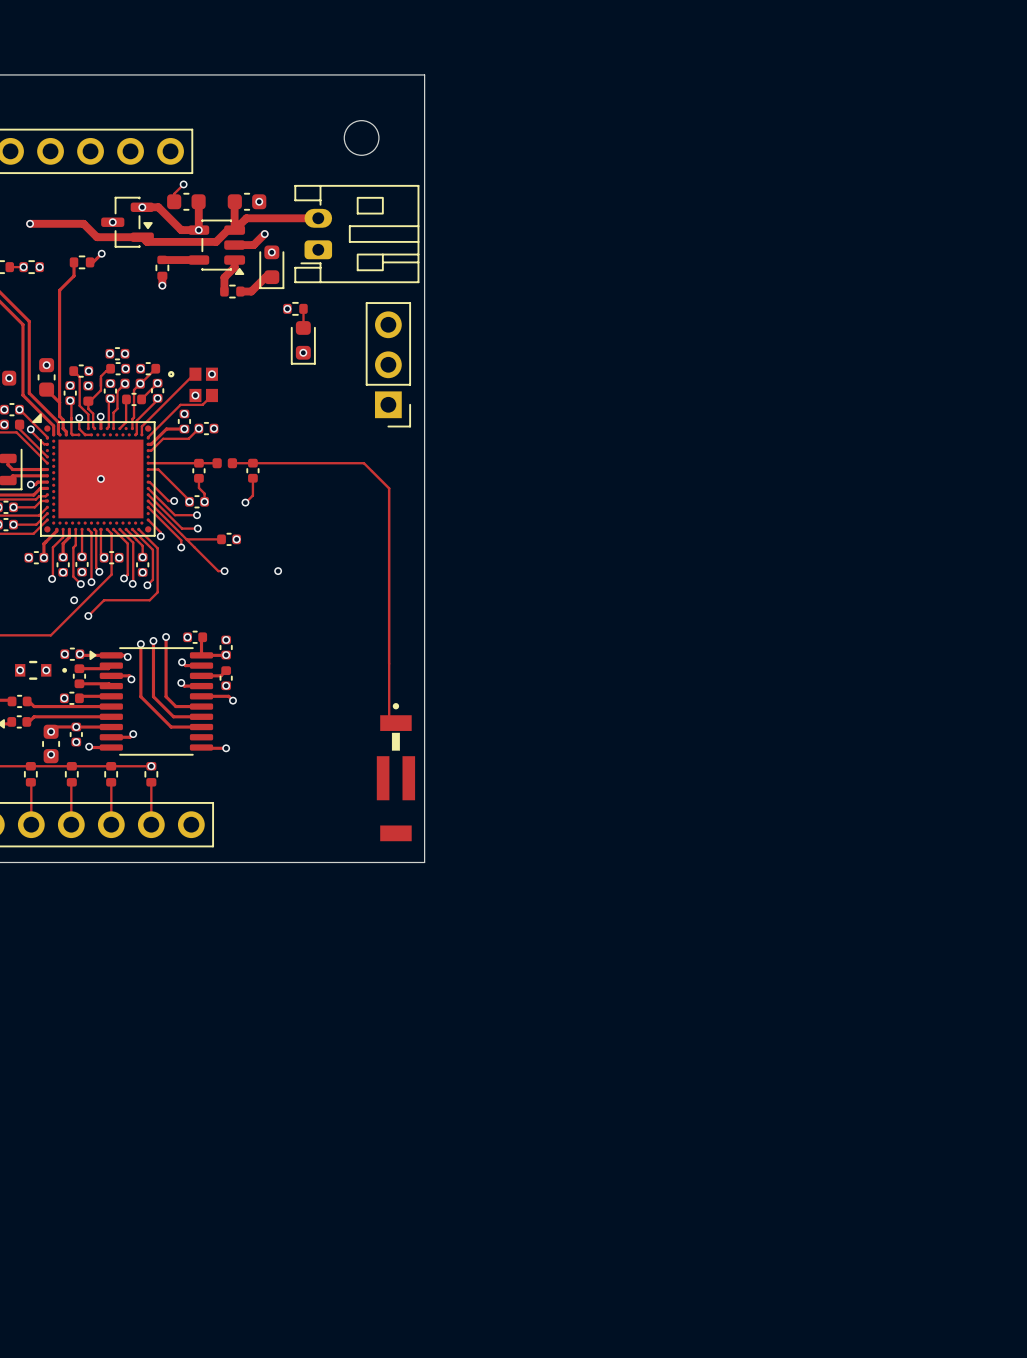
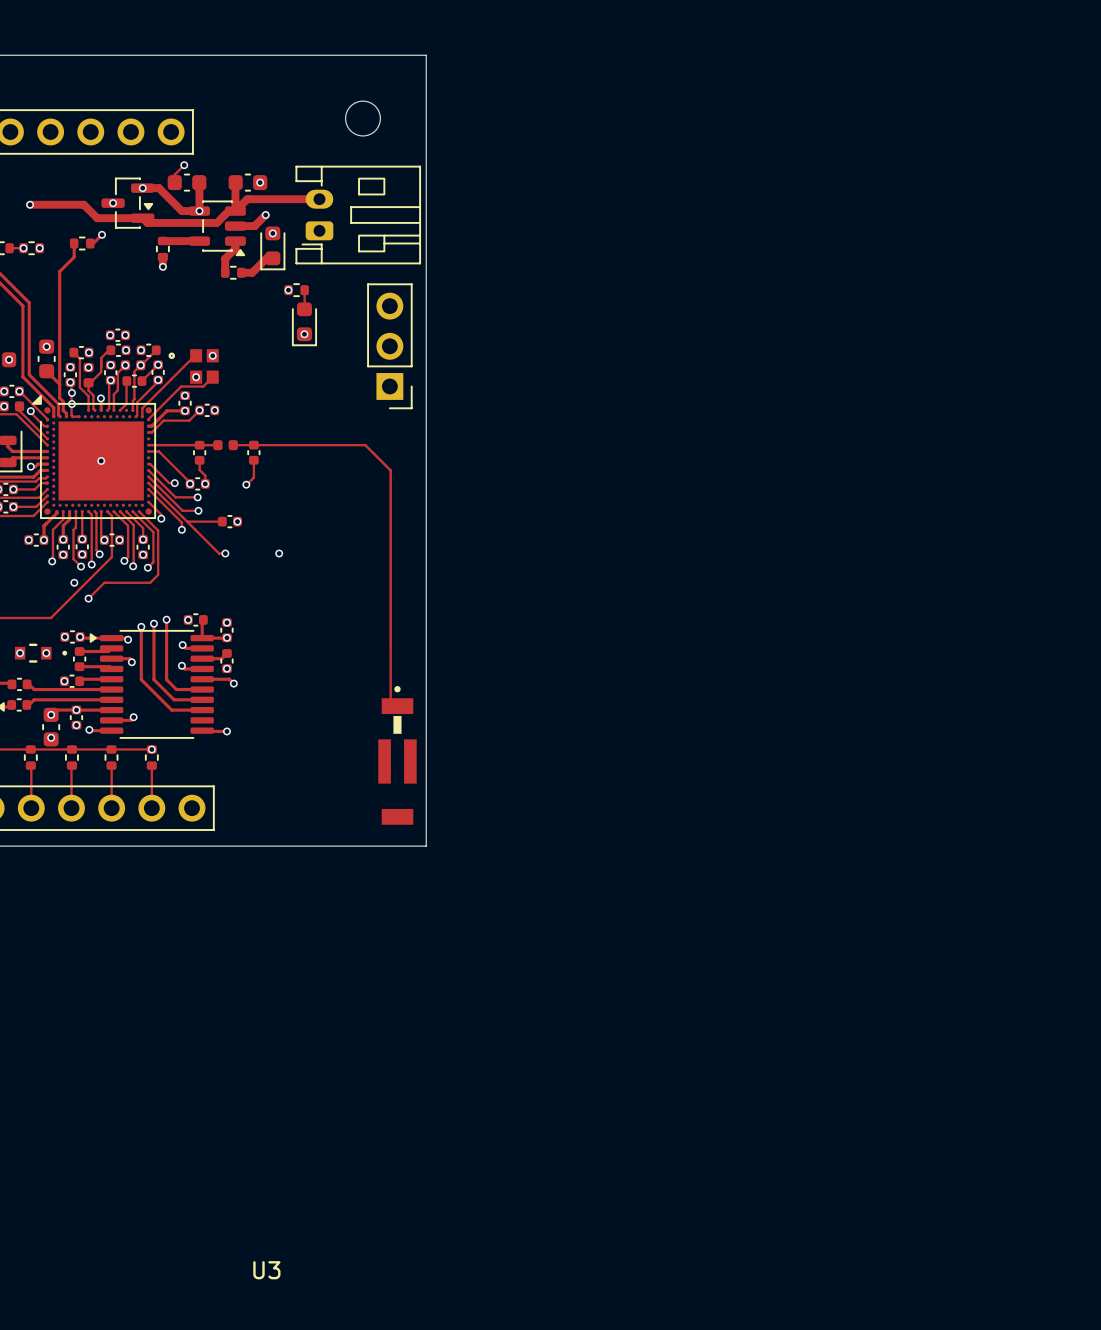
via: none -> (71, 392)
track: (79, 417) (79, 428) (85, 434) (91, 434) -> none
via: (79, 417) -> none
via: none -> (71, 404)
text: none -> U3 (266, 1270)

